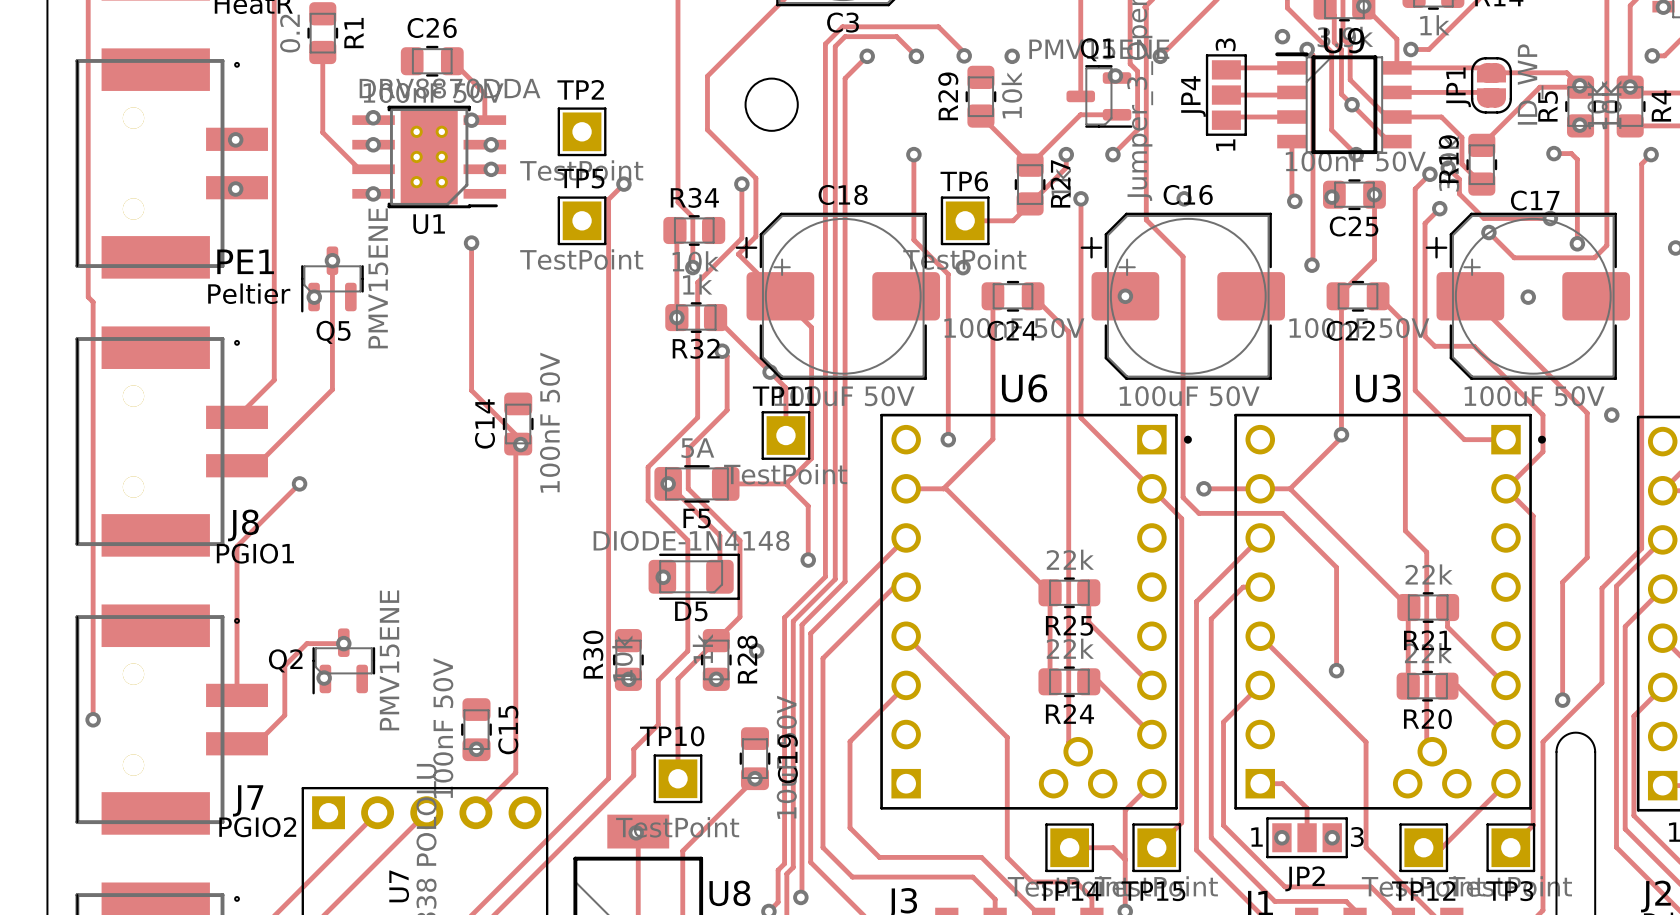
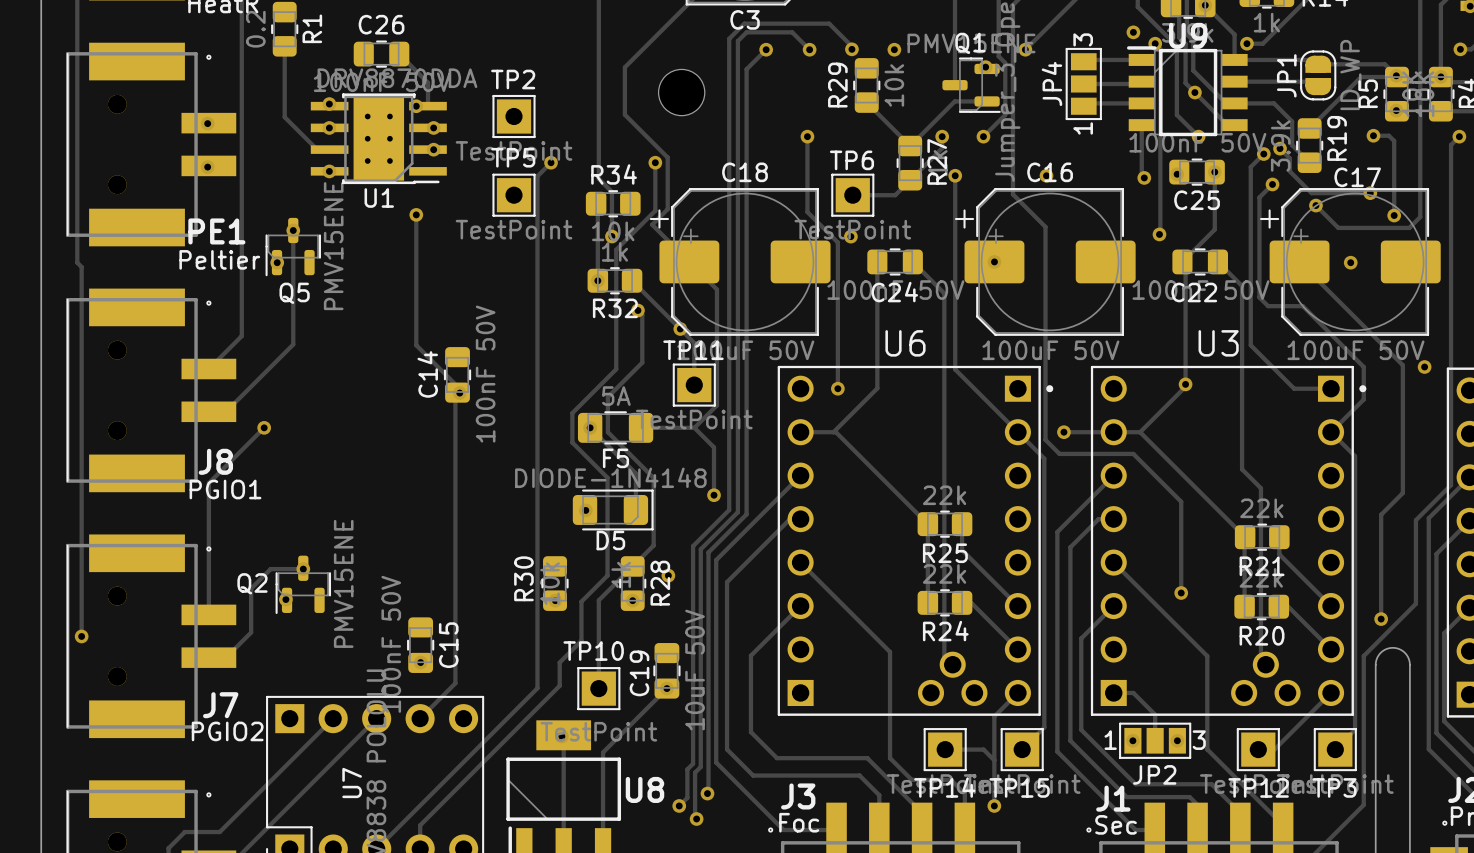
R19 name position: R19 (1448, 159) -> R19 (1337, 138)
C19 name position: C19 (787, 758) -> C19 (639, 673)

